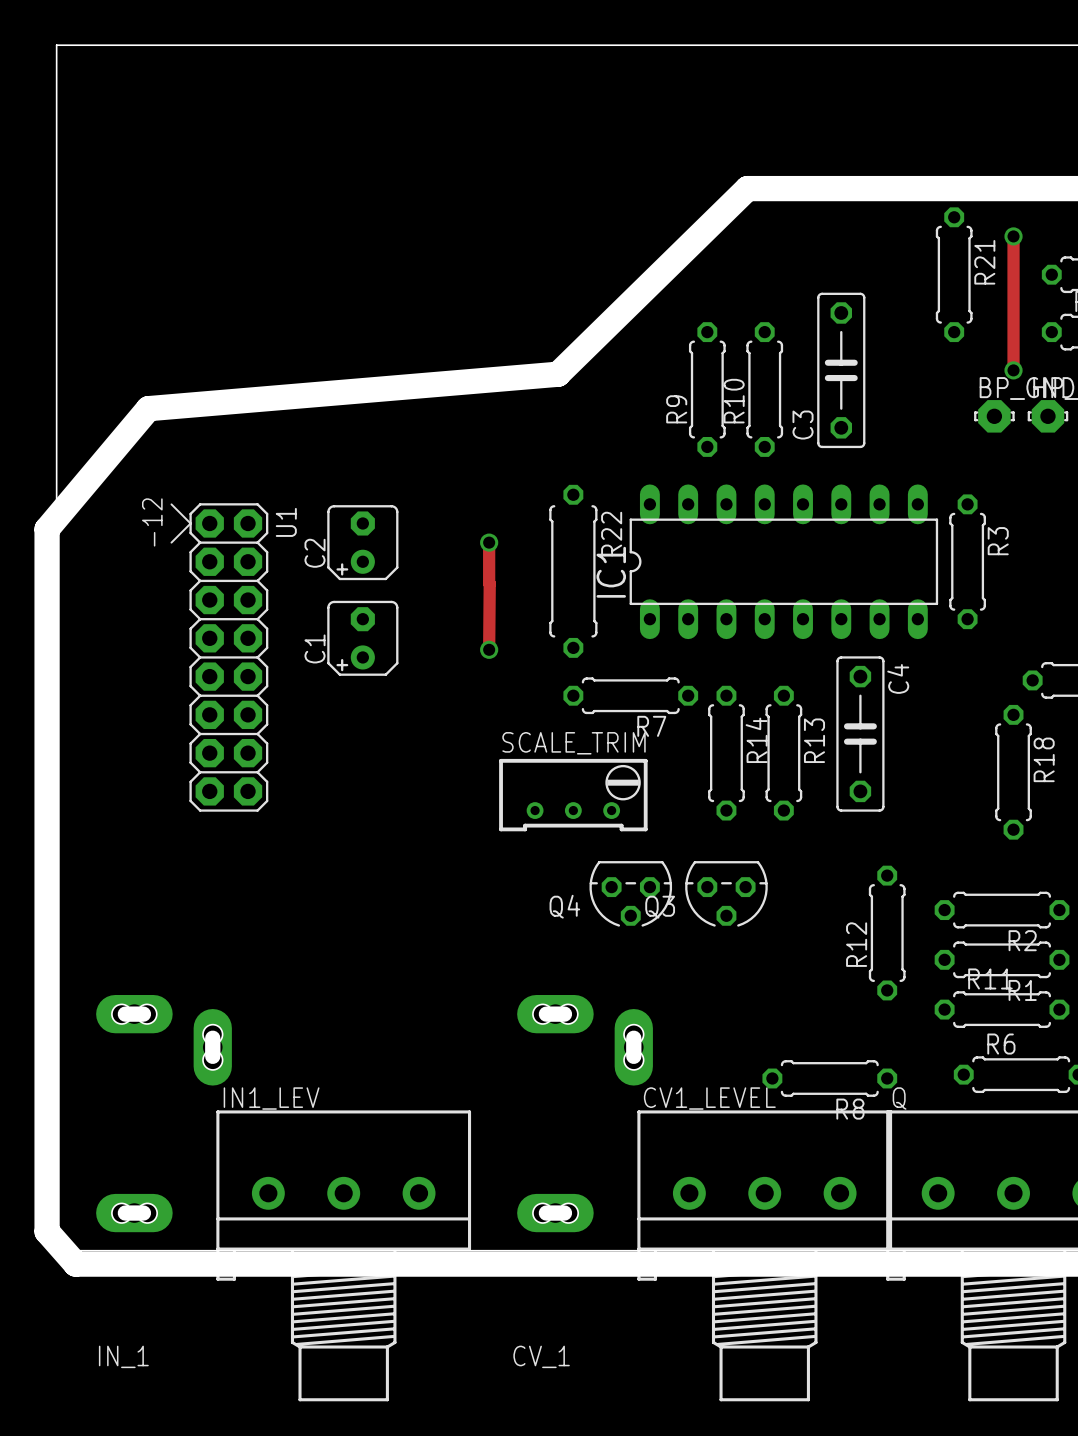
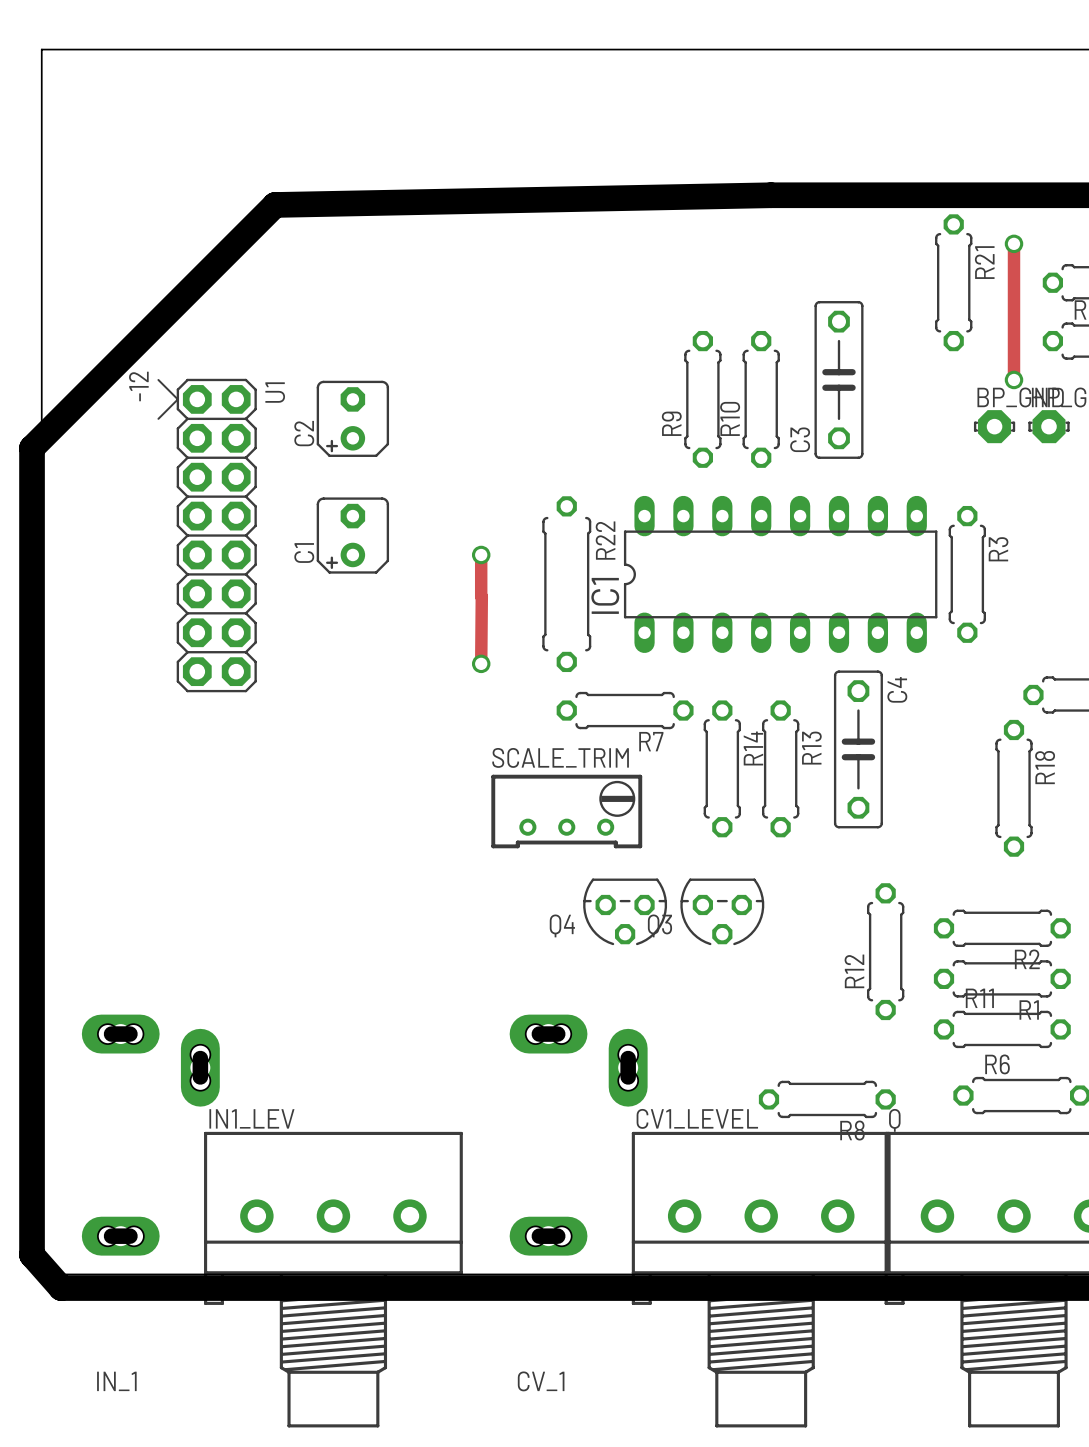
board edge: (774, 188) (747, 188) (558, 374) (148, 408) (47, 529) -> (770, 195) (275, 204) (32, 448) (32, 541)
C2 position: (362, 542) -> (352, 418)
C1 position: (362, 638) -> (352, 535)
U1 position: (219, 657) -> (207, 535)

